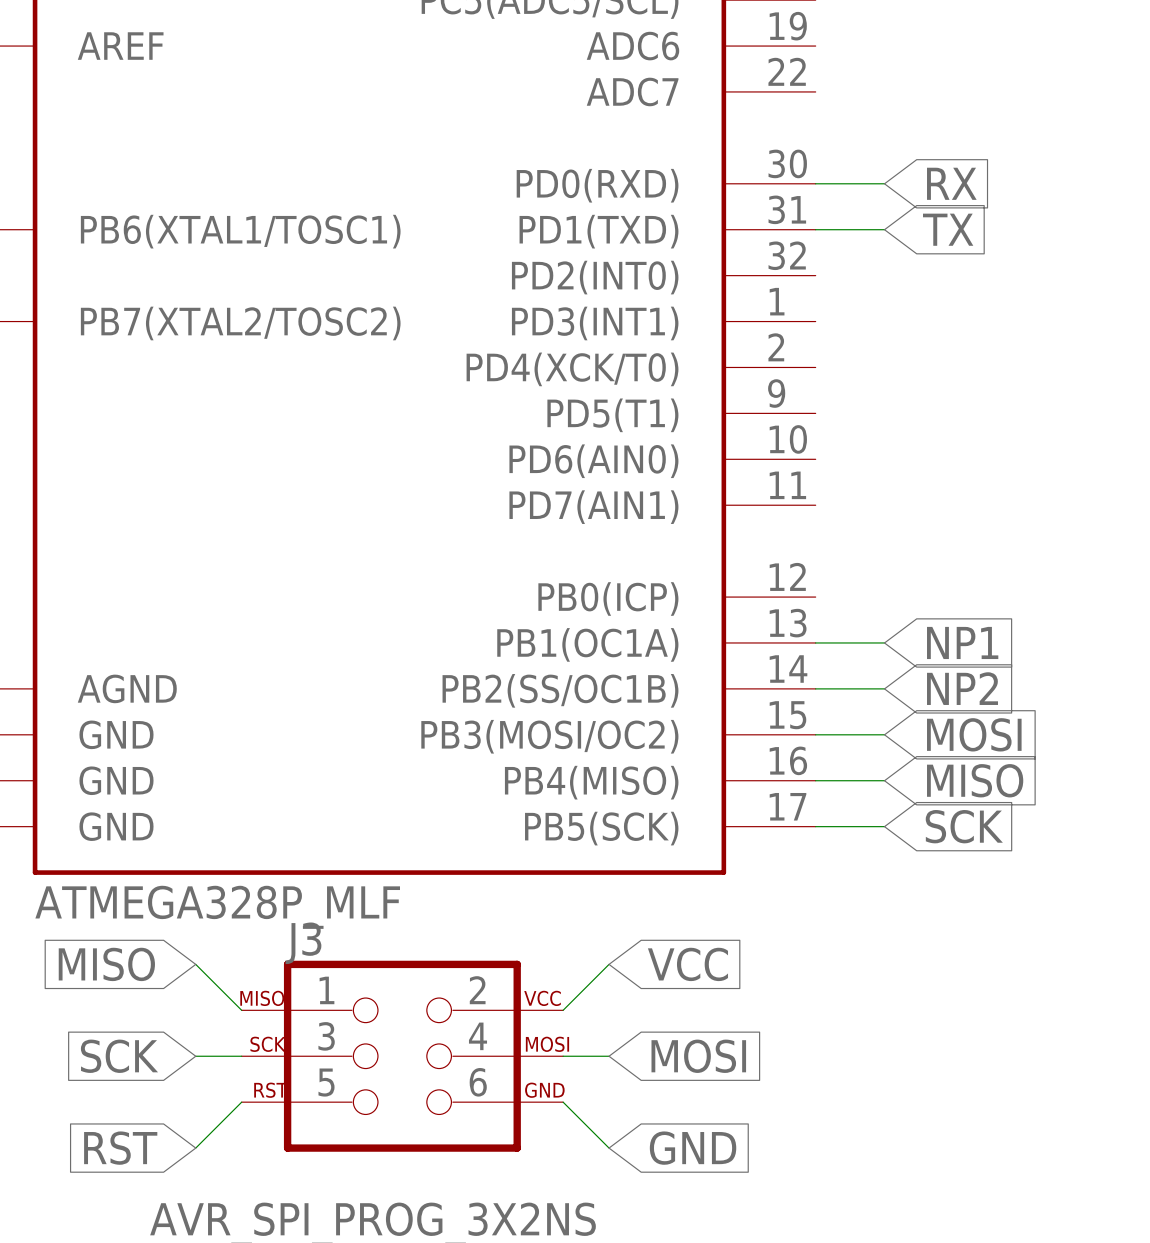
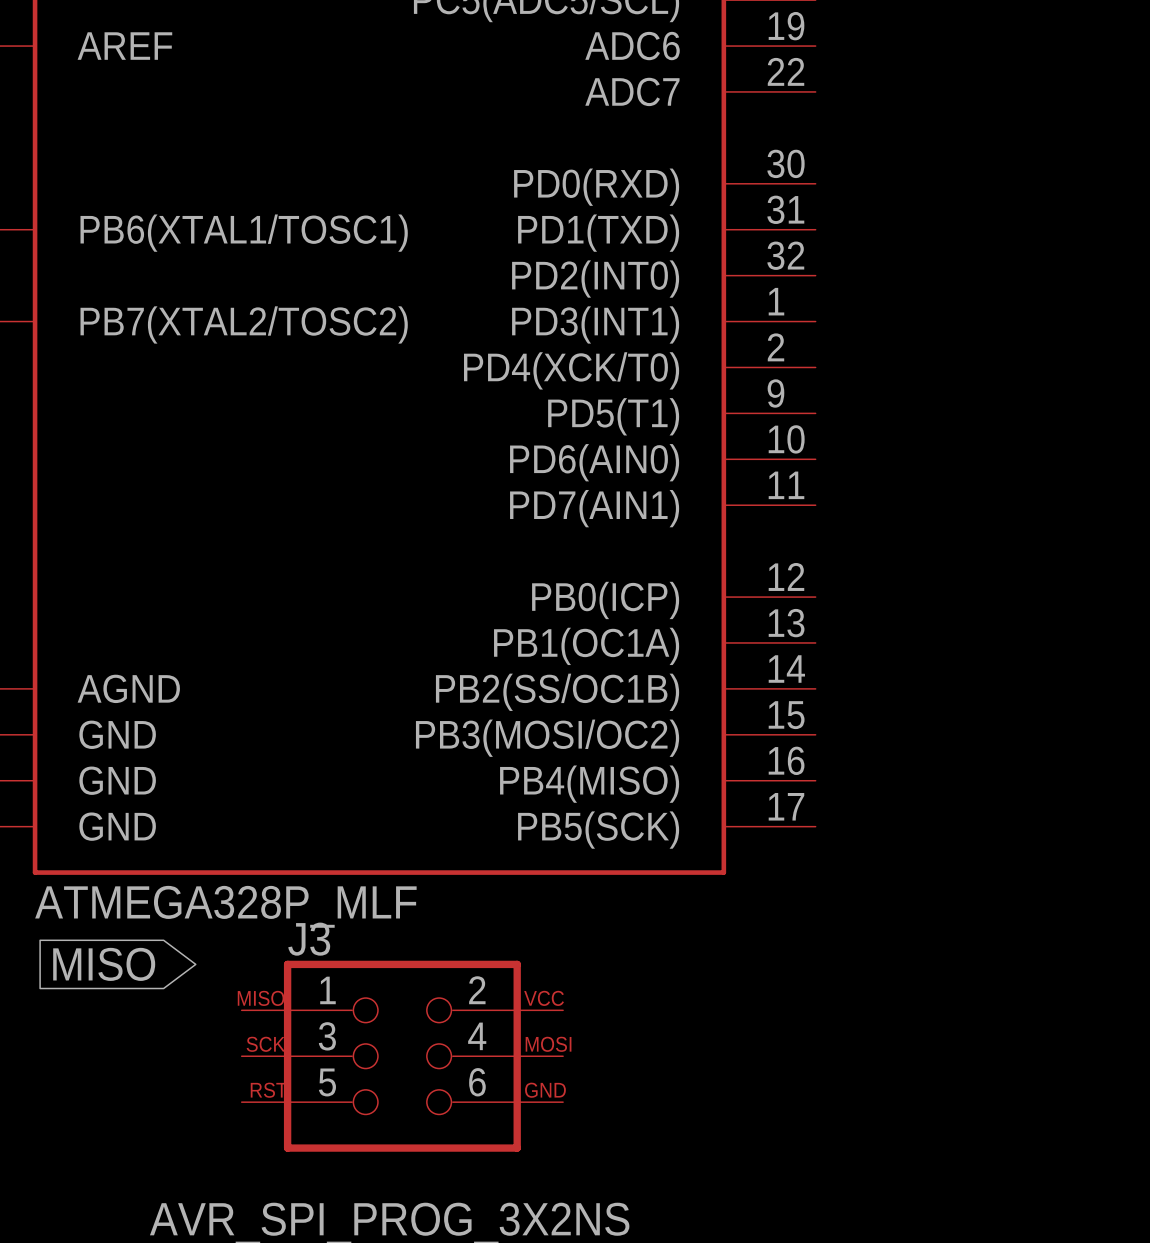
wire: (815, 183) (884, 183) -> none
global label: RX (951, 183) -> none
wire: (815, 229) (884, 229) -> none
global label: TX (948, 229) -> none
wire: (815, 642) (884, 642) -> none
global label: NP1 (962, 642) -> none
wire: (815, 688) (884, 688) -> none
global label: NP2 (962, 688) -> none
wire: (815, 734) (884, 734) -> none
global label: MOSI (974, 734) -> none
wire: (815, 780) (884, 780) -> none
global label: MISO (975, 780) -> none
wire: (815, 826) (884, 826) -> none
global label: SCK (964, 826) -> none
wire: (195, 964) (241, 1010) -> none
wire: (609, 964) (563, 1010) -> none
global label: VCC (687, 964) -> none
global label: SCK (119, 1056) -> none
wire: (195, 1056) (241, 1056) -> none
wire: (563, 1056) (609, 1056) -> none
global label: MOSI (698, 1056) -> none
wire: (241, 1102) (195, 1148) -> none
wire: (563, 1102) (609, 1148) -> none
global label: RST (120, 1148) -> none
global label: GND (693, 1148) -> none

